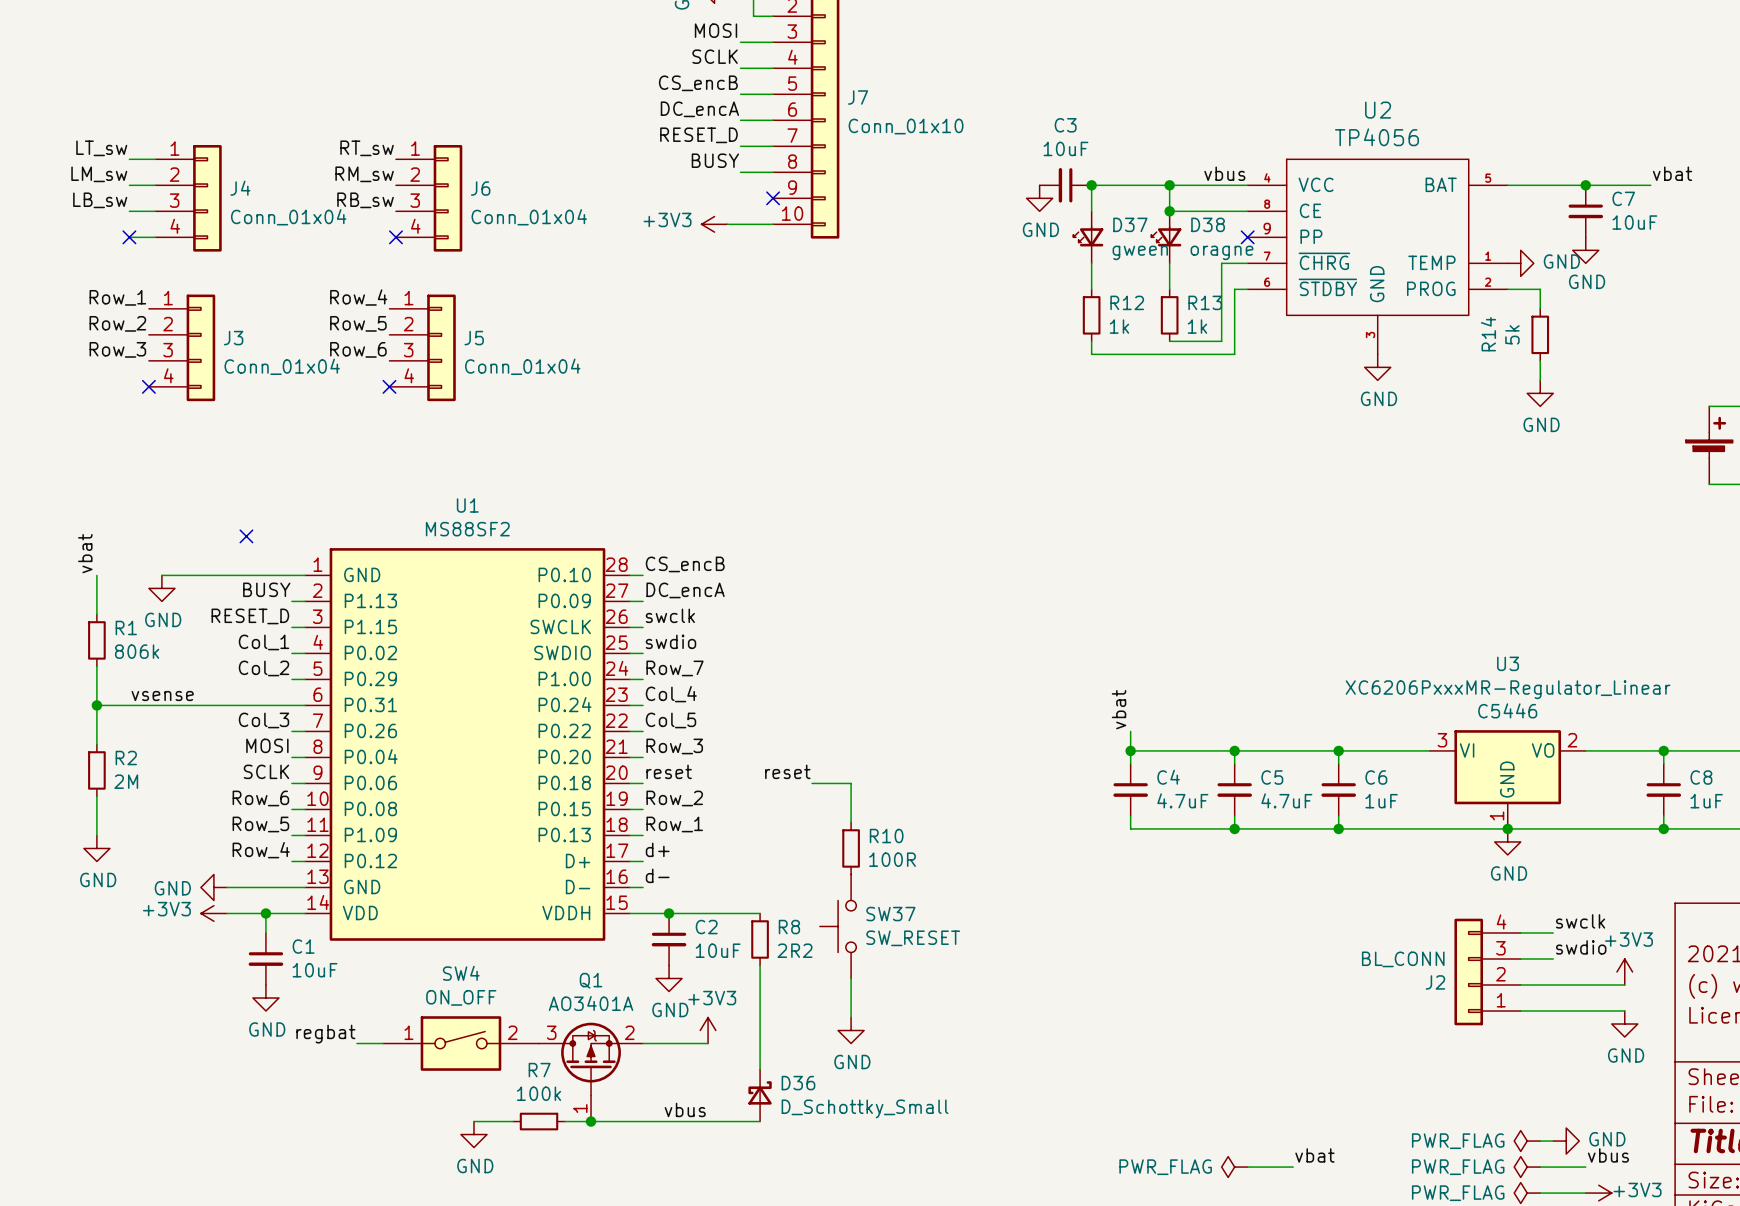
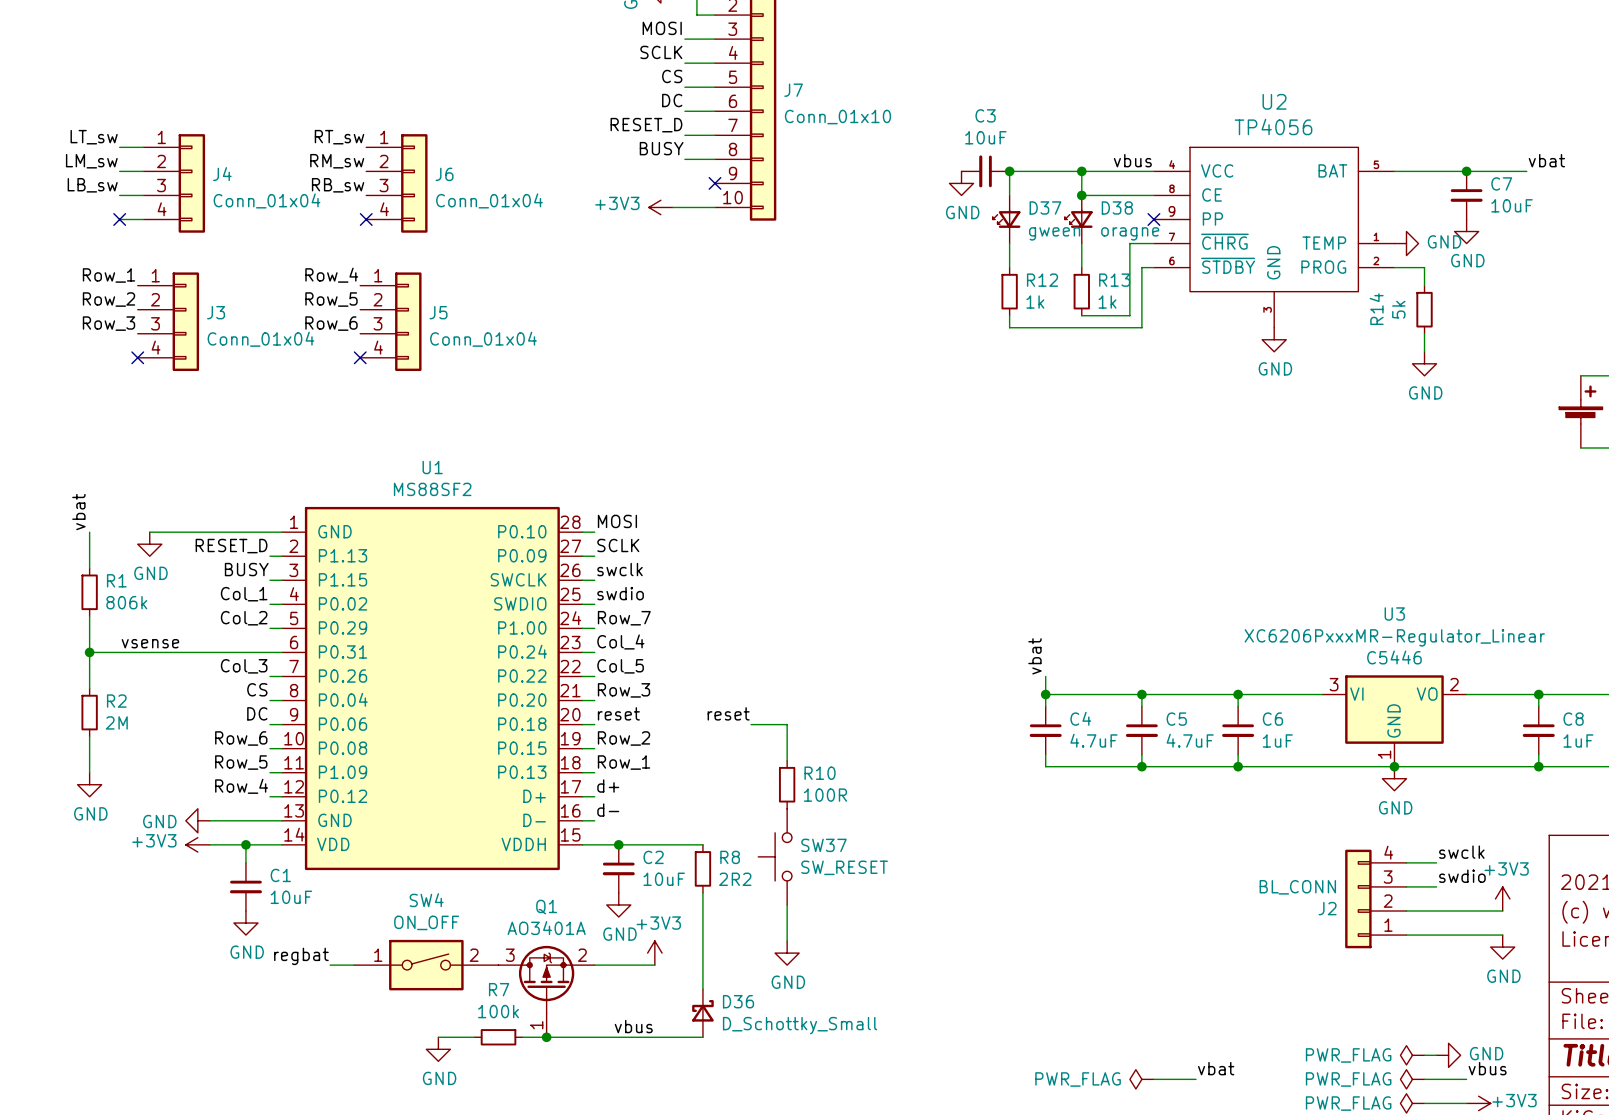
label: CS_encB (698, 83) -> CS (672, 76)
label: DC_encA (699, 109) -> DC (672, 100)
no-connect mark: (246, 536) -> none
label: CS_encB (685, 564) -> MOSI (617, 521)
label: BUSY (266, 589) -> RESET_D (231, 546)
label: DC_encA (685, 590) -> SCLK (618, 545)
label: RESET_D (250, 616) -> BUSY (246, 569)
label: MOSI (267, 745) -> CS (257, 689)
label: SCLK (266, 771) -> DC (257, 713)

